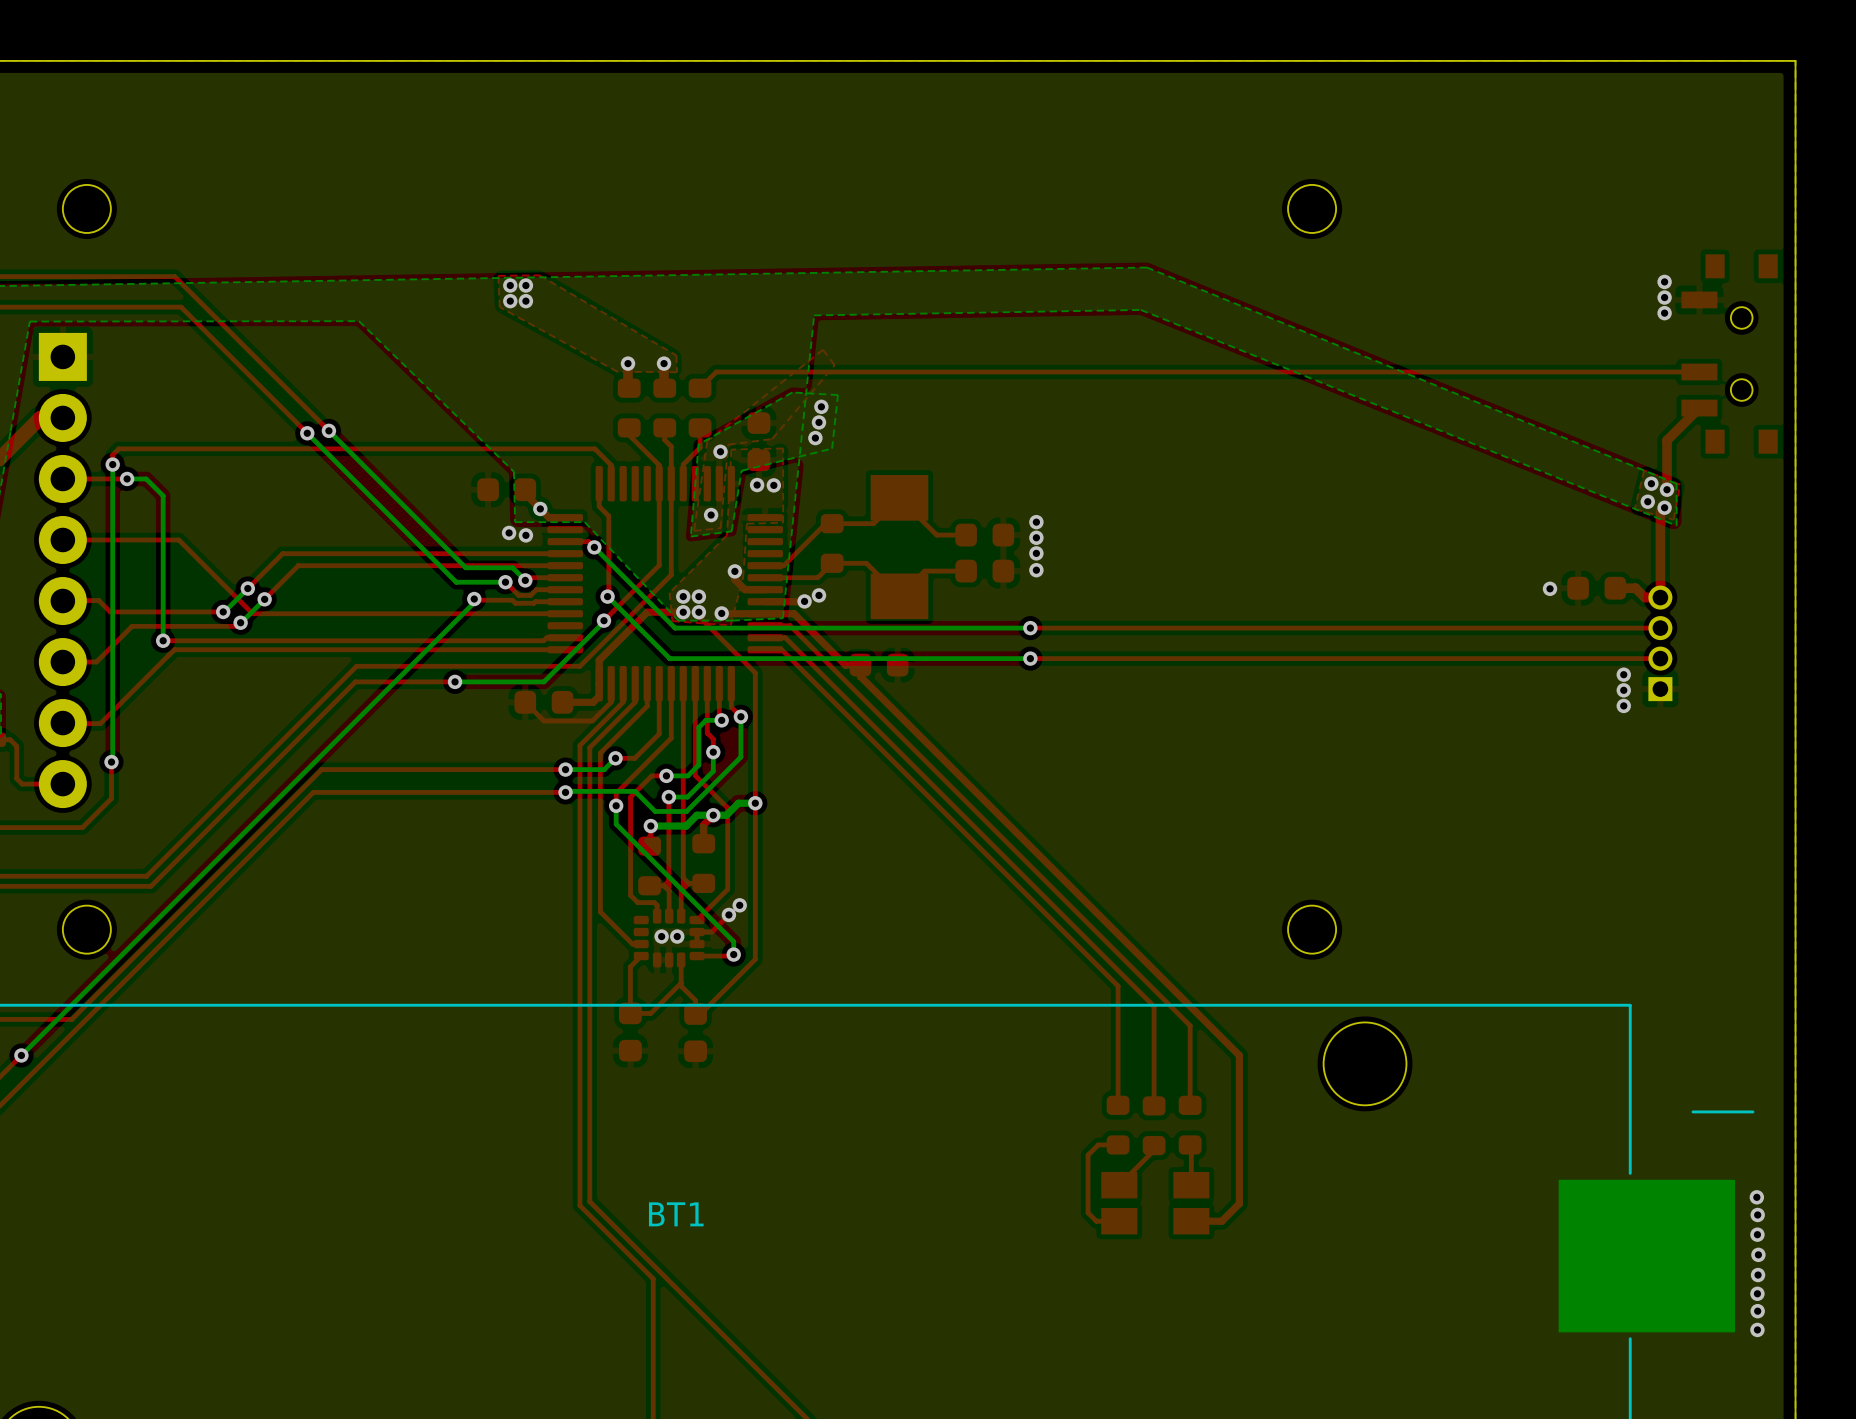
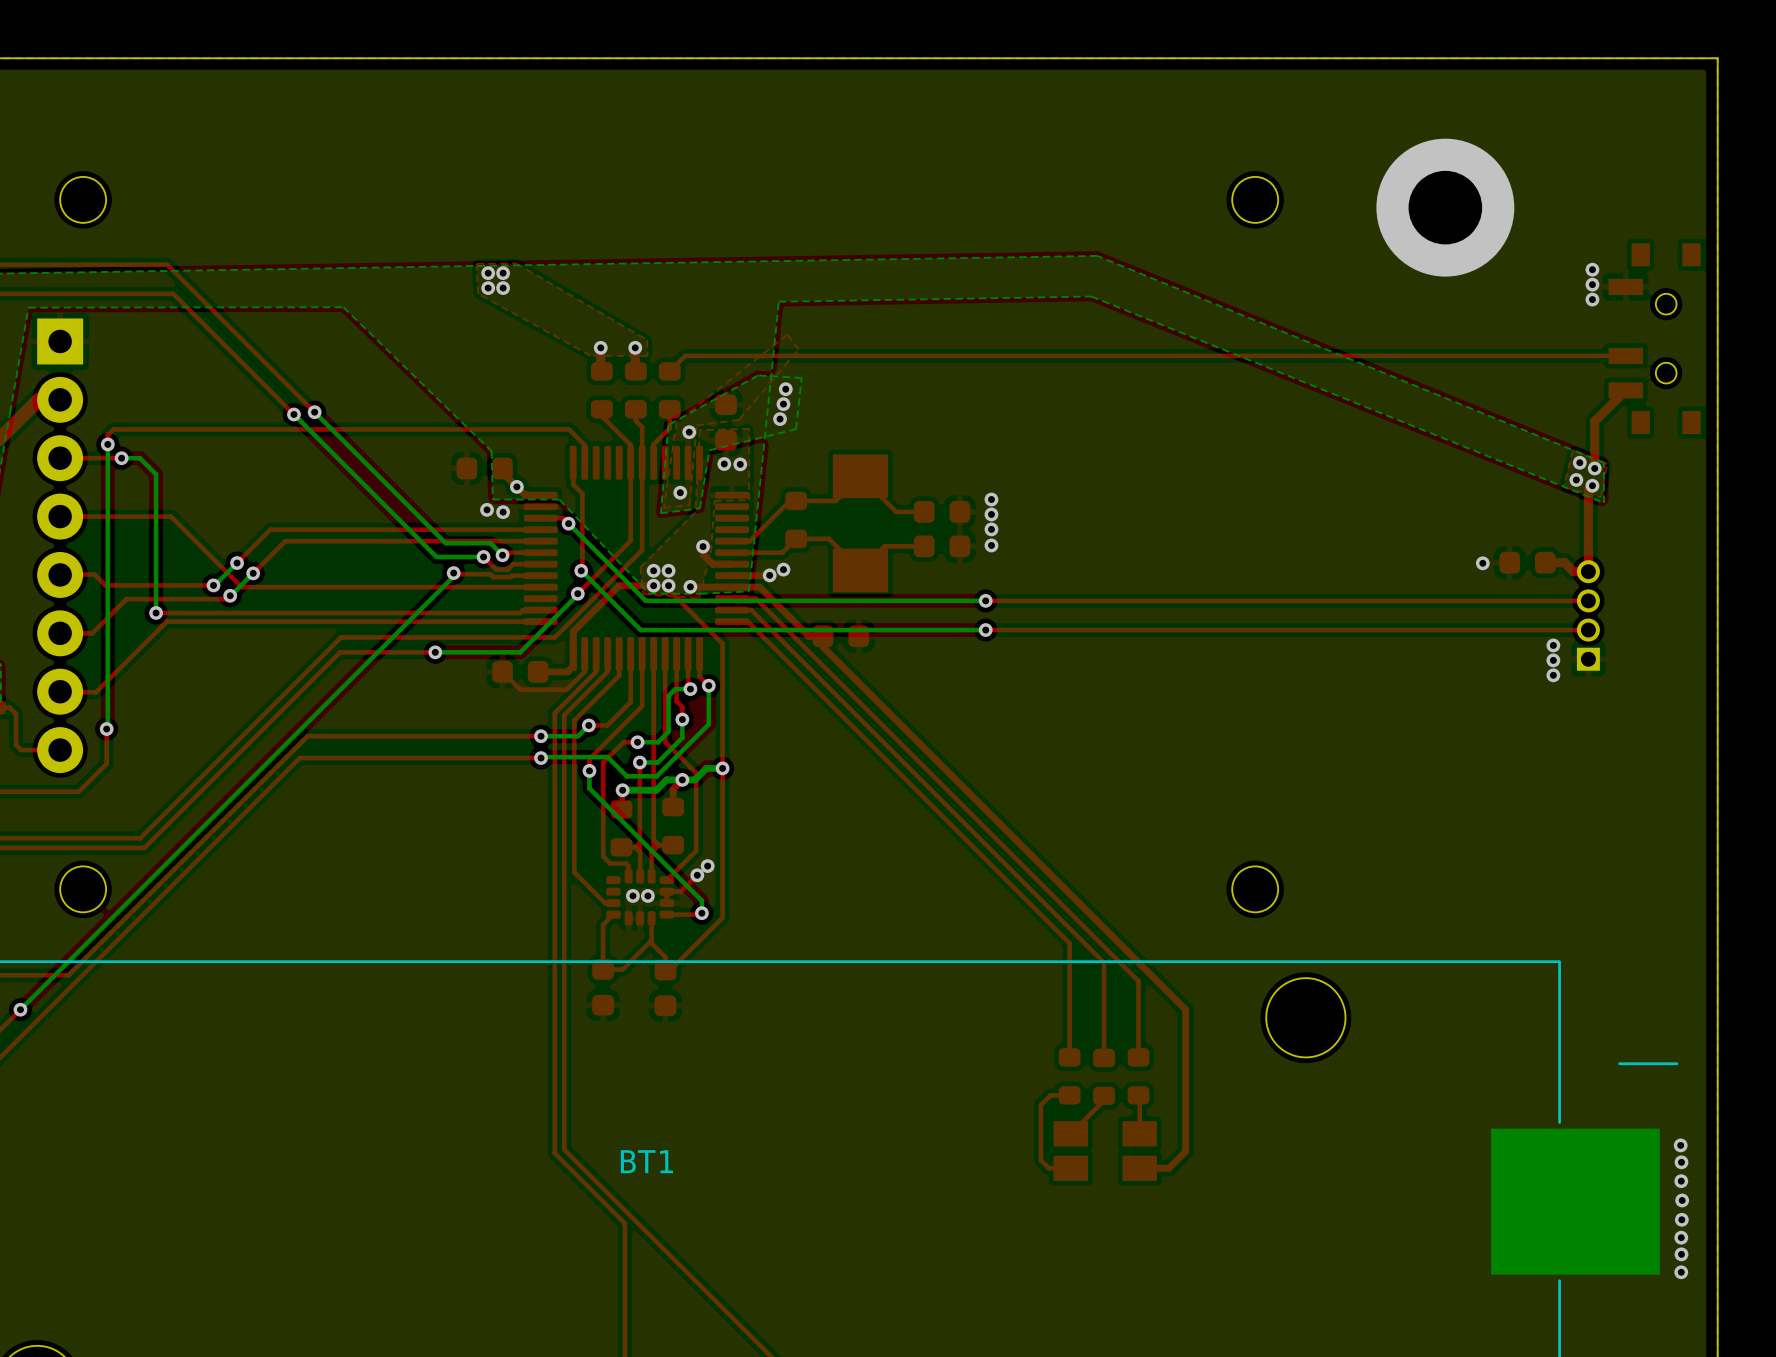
via: none -> (1445, 207)

